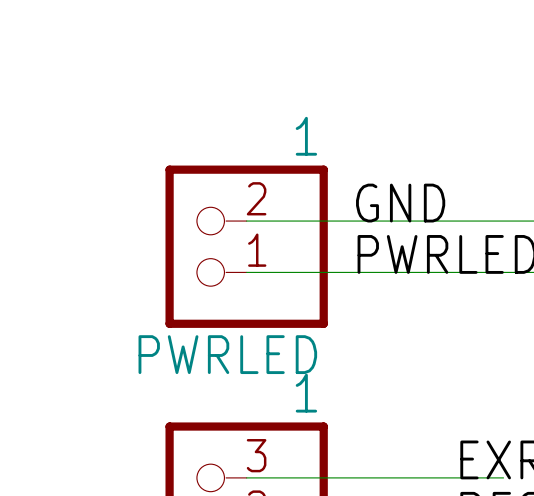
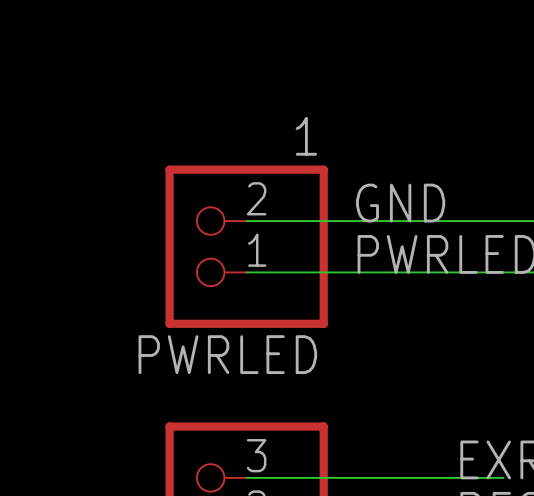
part value: 1 (306, 393) -> none

